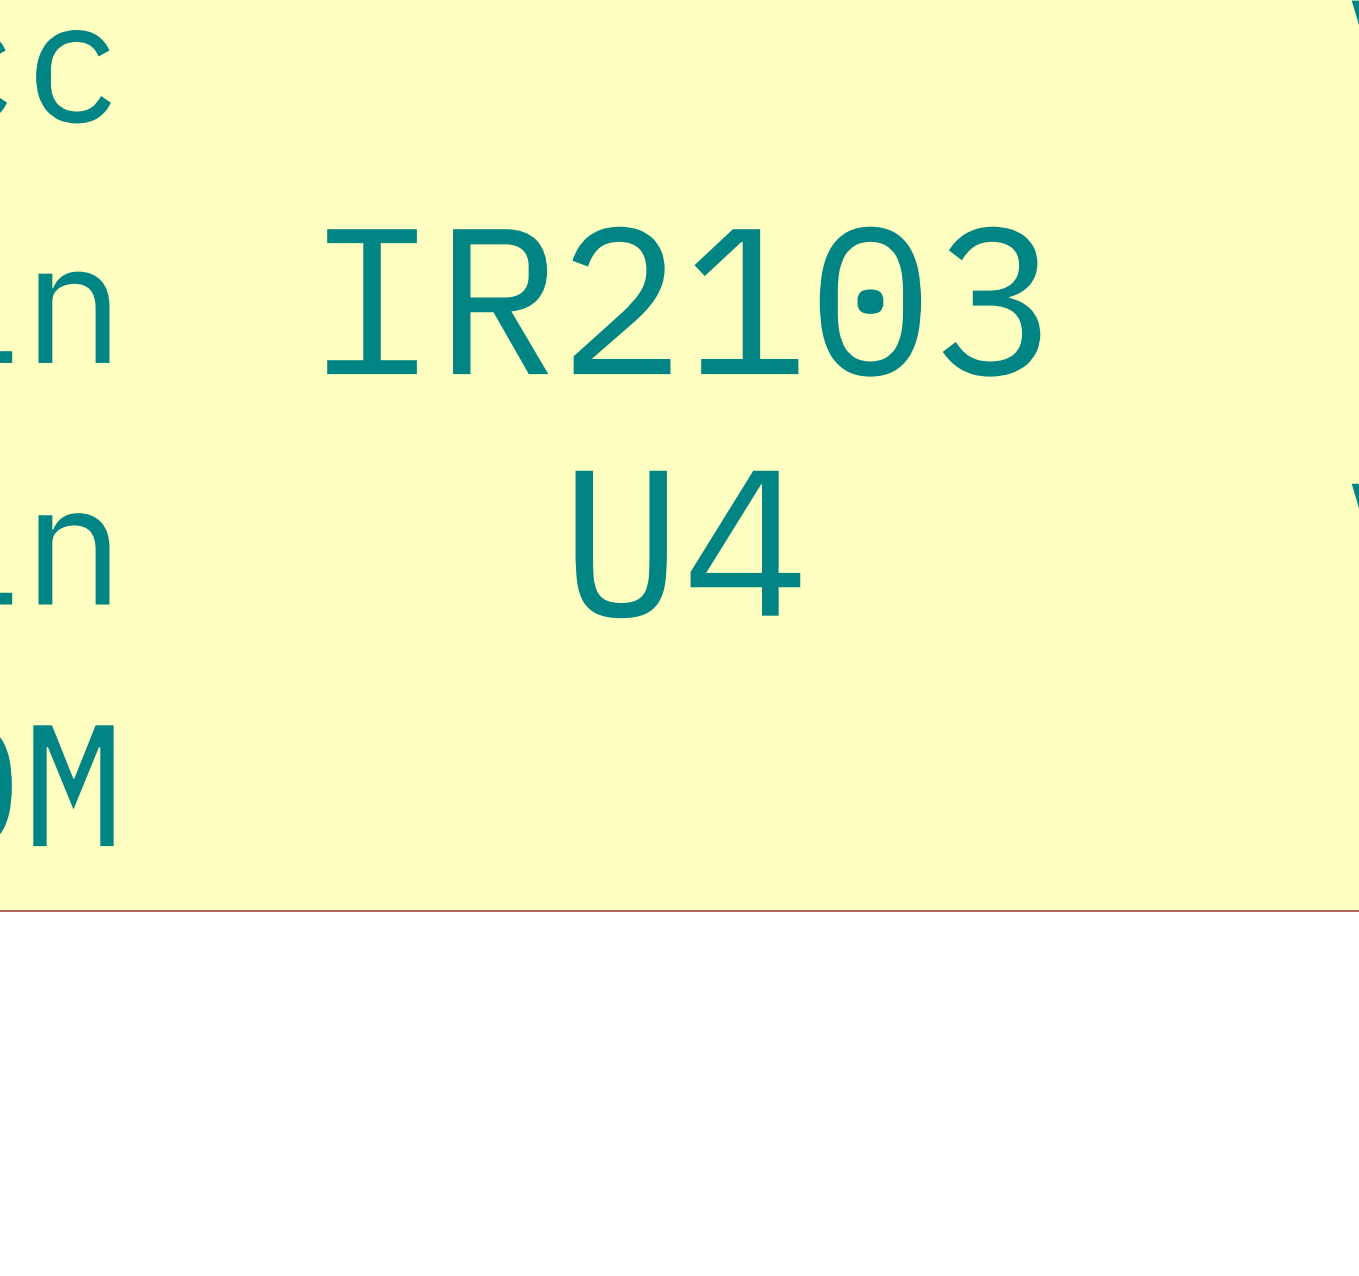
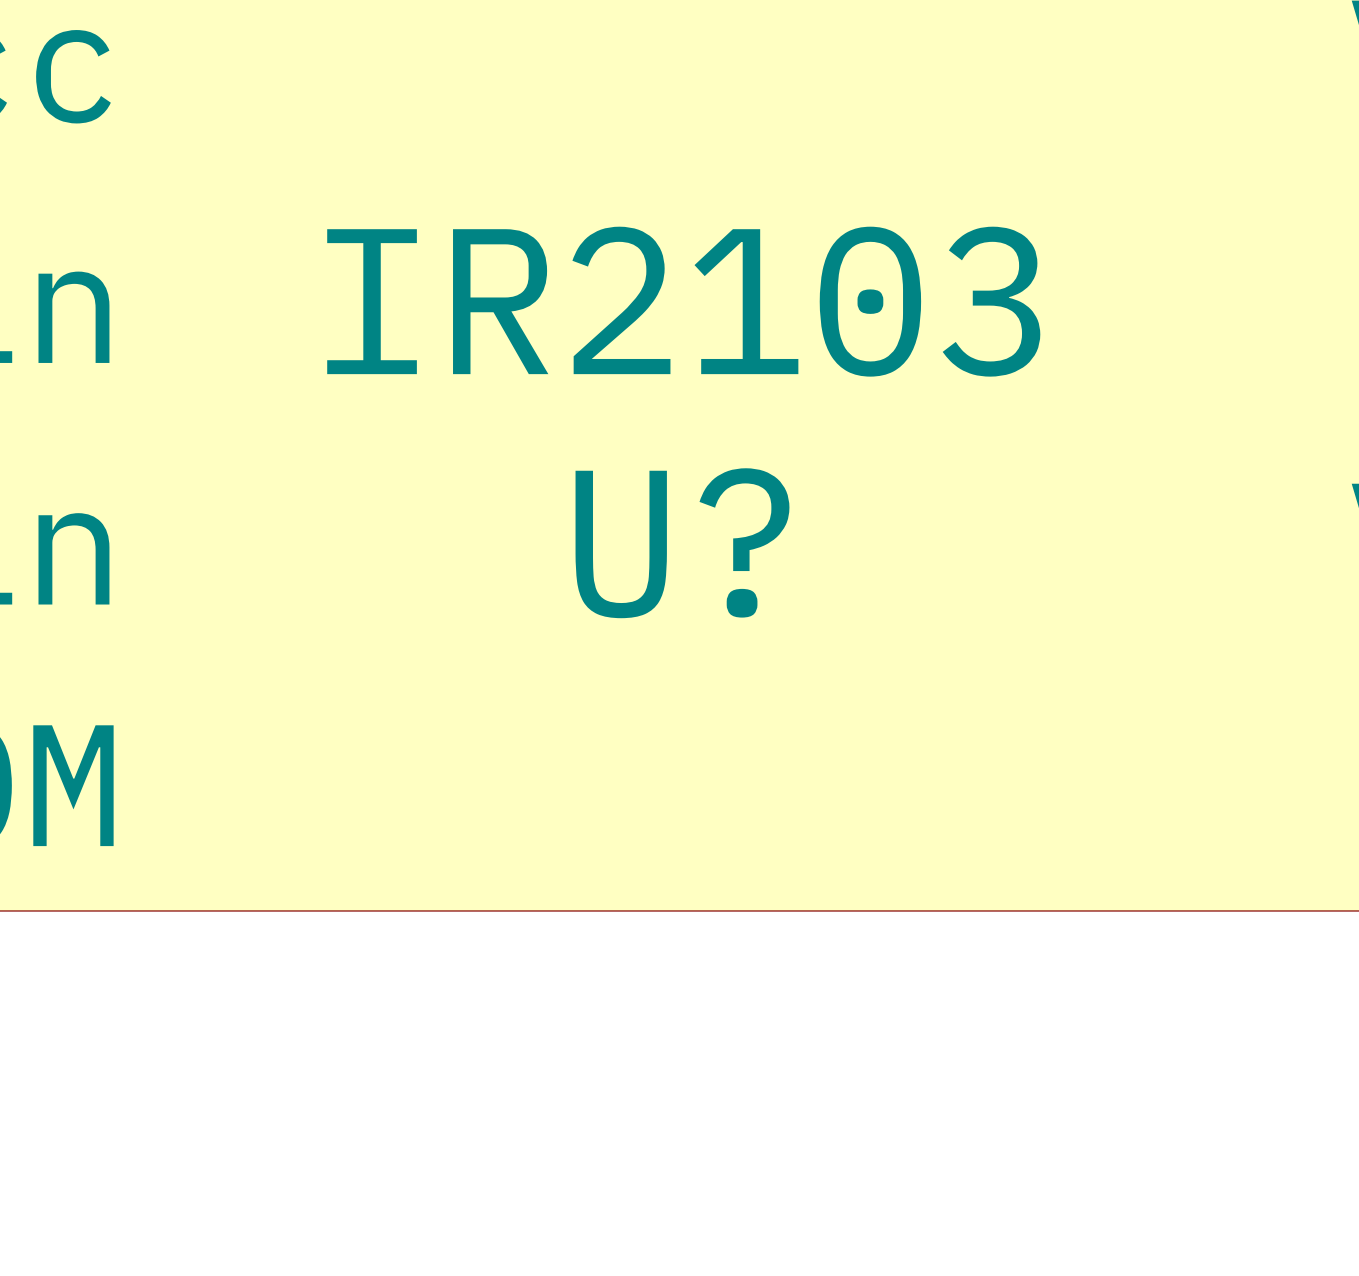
U4 name: U4 (687, 544) -> U? (682, 543)

